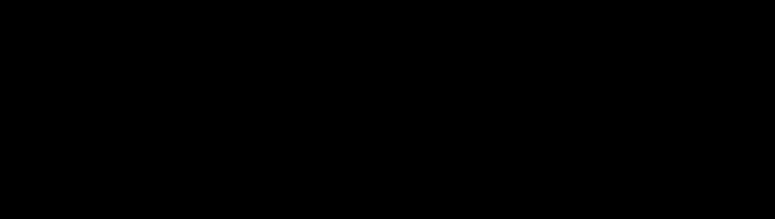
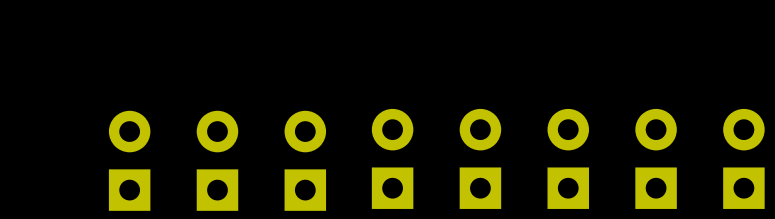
part: none -> (392, 158)
part: none -> (480, 158)
part: none -> (568, 158)
part: none -> (656, 158)
part: none -> (743, 158)
part: none -> (129, 160)
part: none -> (217, 160)
part: none -> (305, 160)

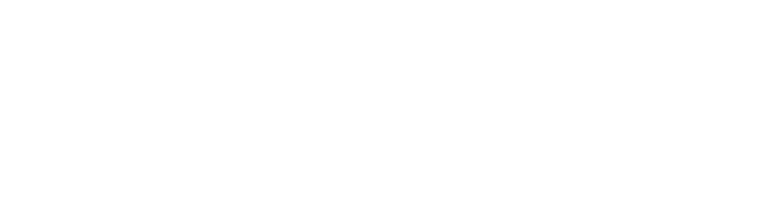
part: (392, 158) -> none
part: (480, 158) -> none
part: (568, 158) -> none
part: (656, 158) -> none
part: (743, 158) -> none
part: (129, 160) -> none
part: (217, 160) -> none
part: (305, 160) -> none

